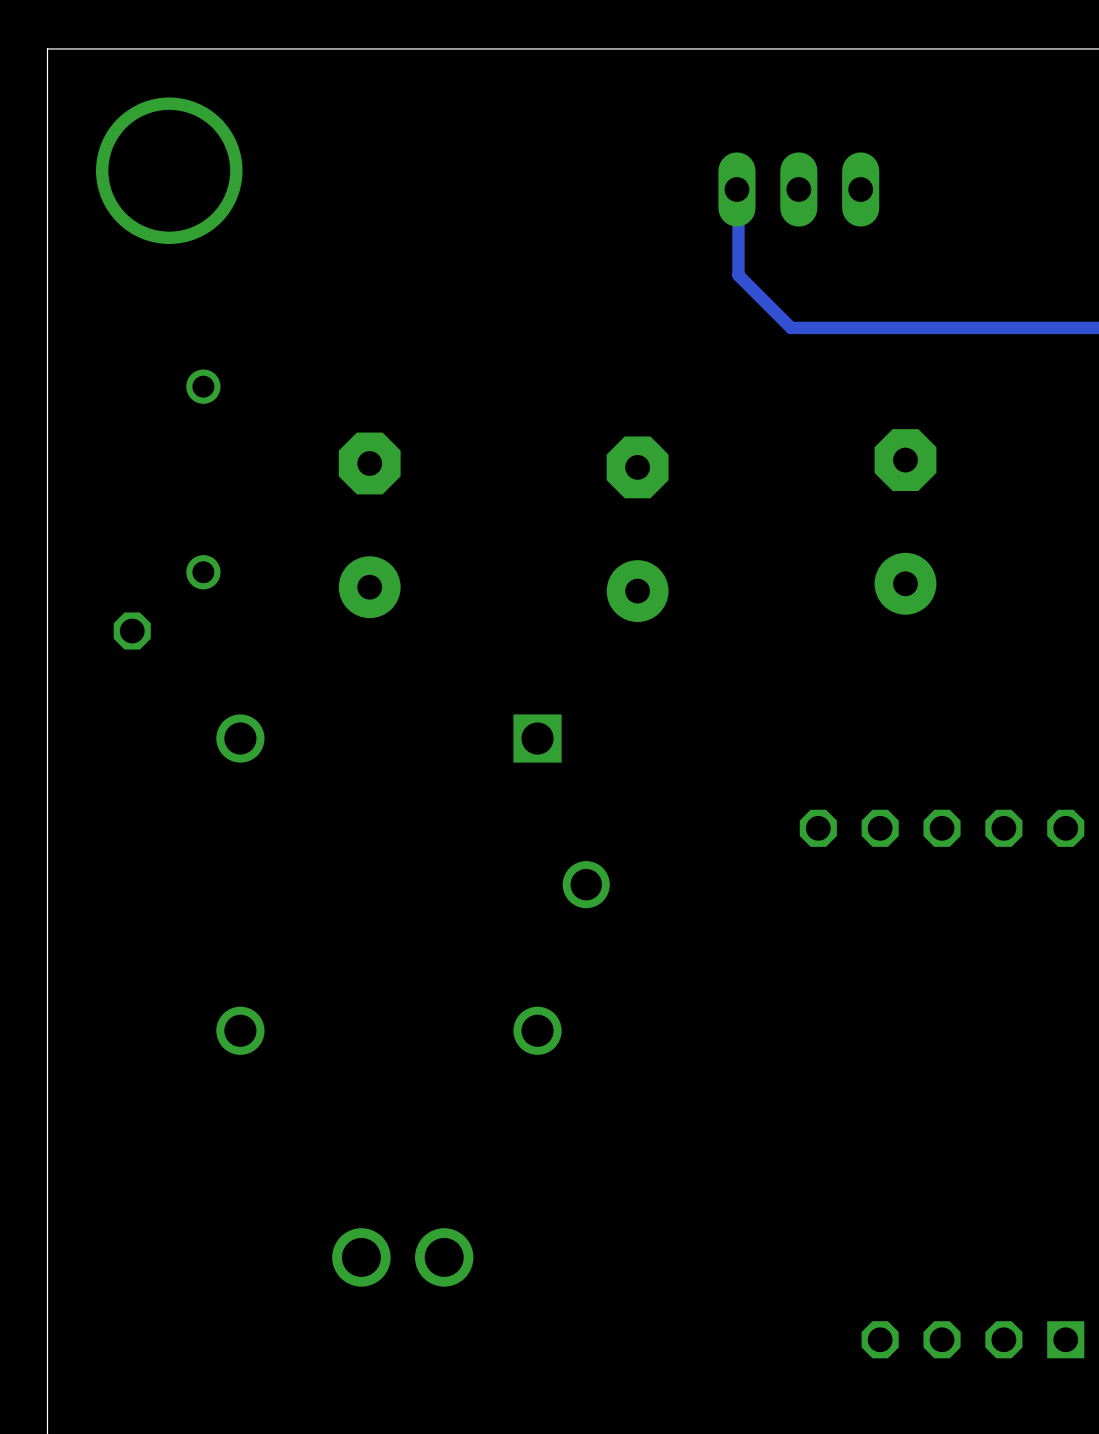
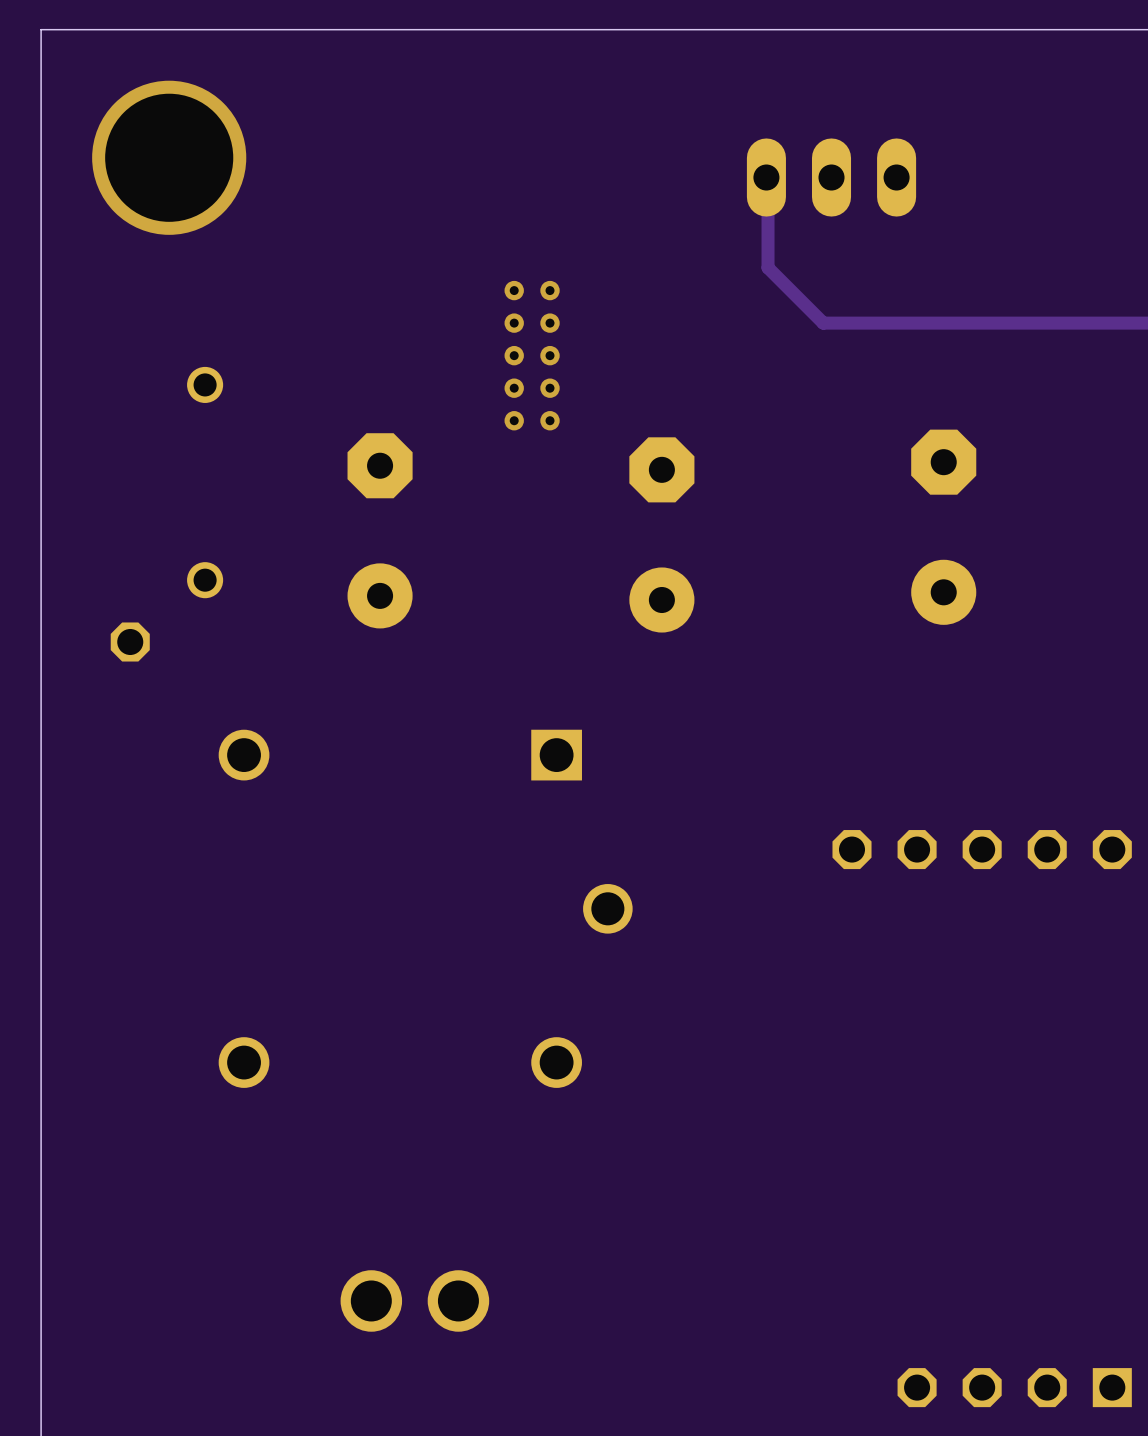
via: none -> (514, 290)
via: none -> (550, 290)
via: none -> (514, 323)
via: none -> (550, 323)
via: none -> (514, 355)
via: none -> (550, 355)
via: none -> (514, 388)
via: none -> (550, 388)
via: none -> (514, 420)
via: none -> (550, 420)

